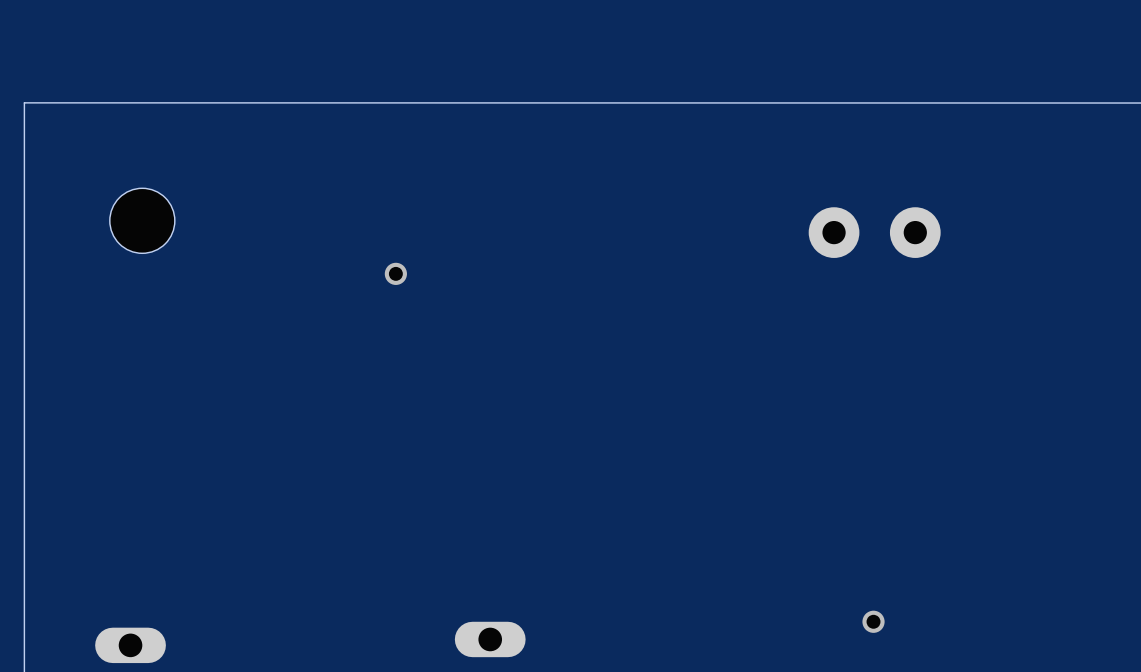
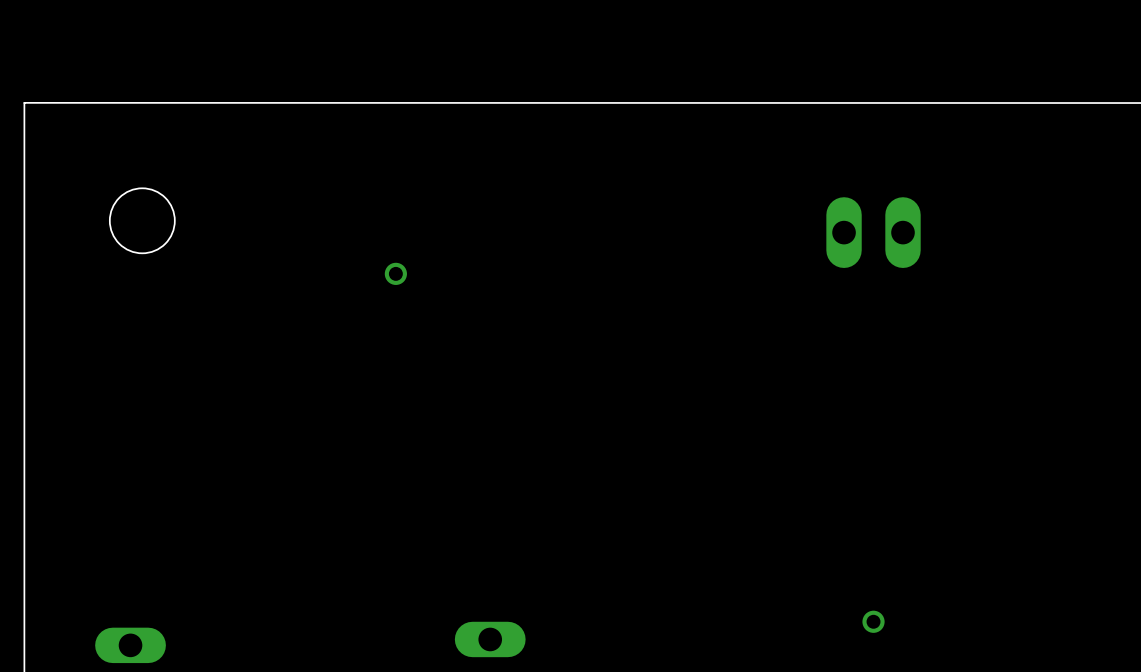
part footprint: [808, 207, 941, 258] -> [826, 197, 921, 268]

